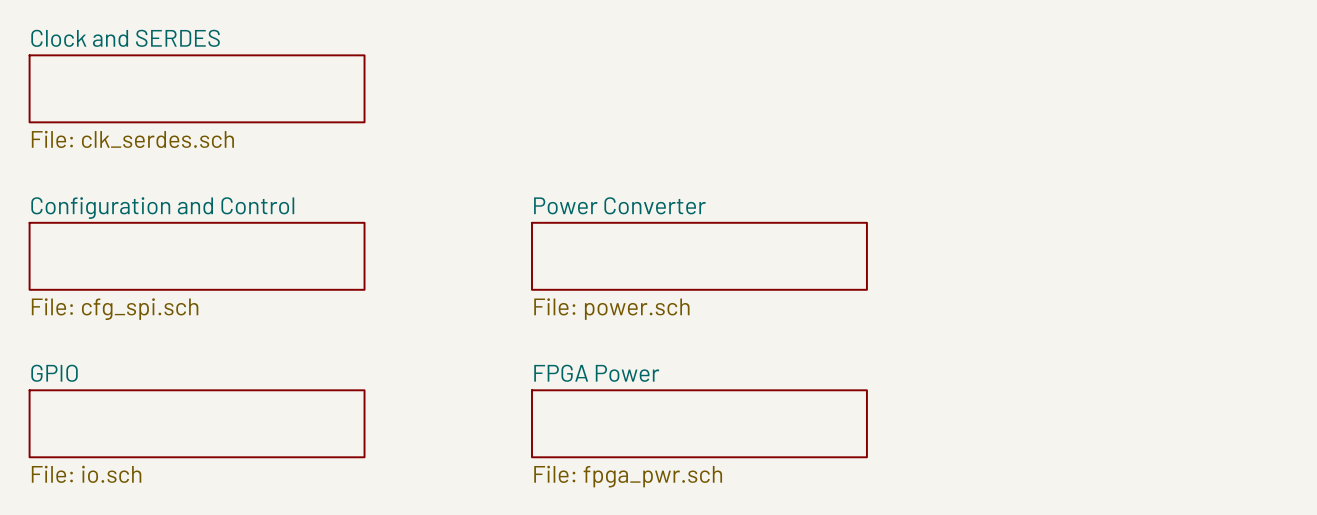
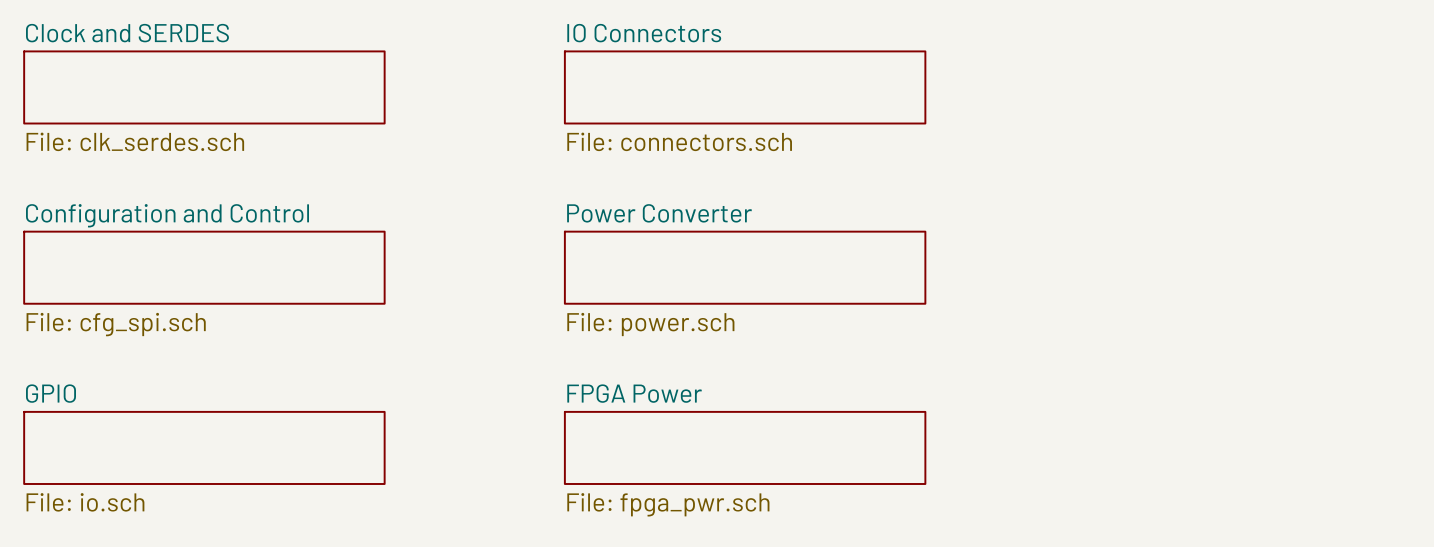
sheet IO Connectors: none -> File: connectors.sch (745, 87)

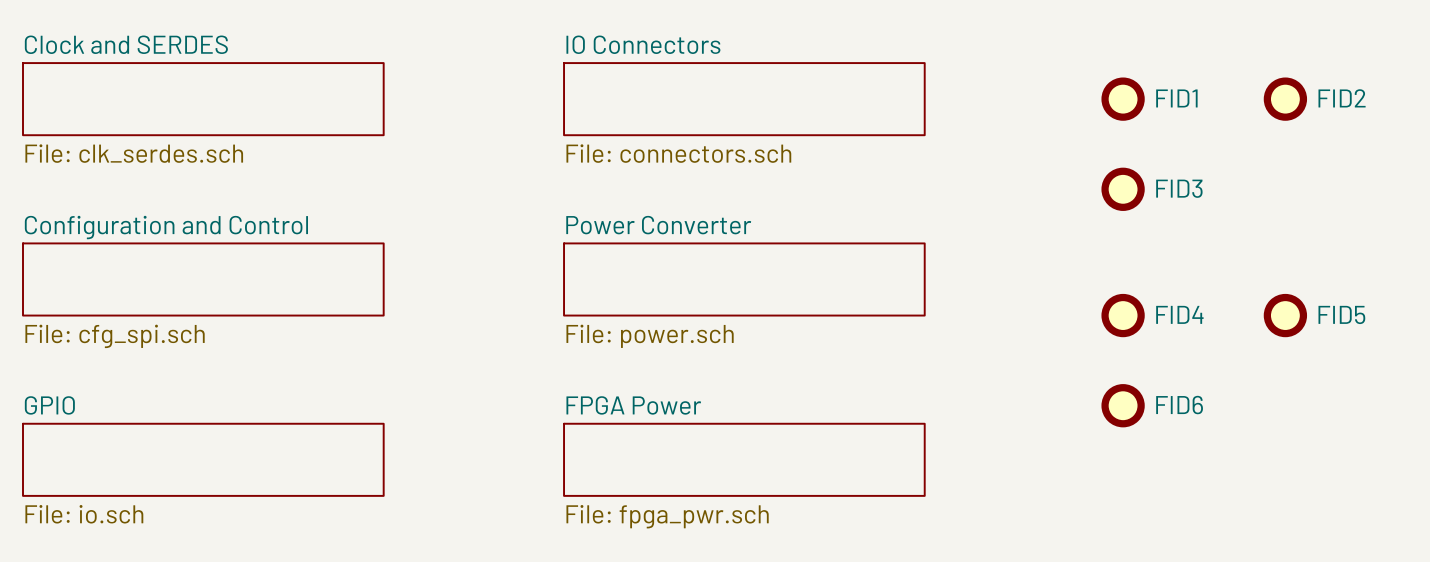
FID1: none -> (1123, 99)
FID2: none -> (1285, 99)
FID3: none -> (1123, 189)
FID4: none -> (1123, 315)
FID5: none -> (1285, 315)
FID6: none -> (1123, 405)

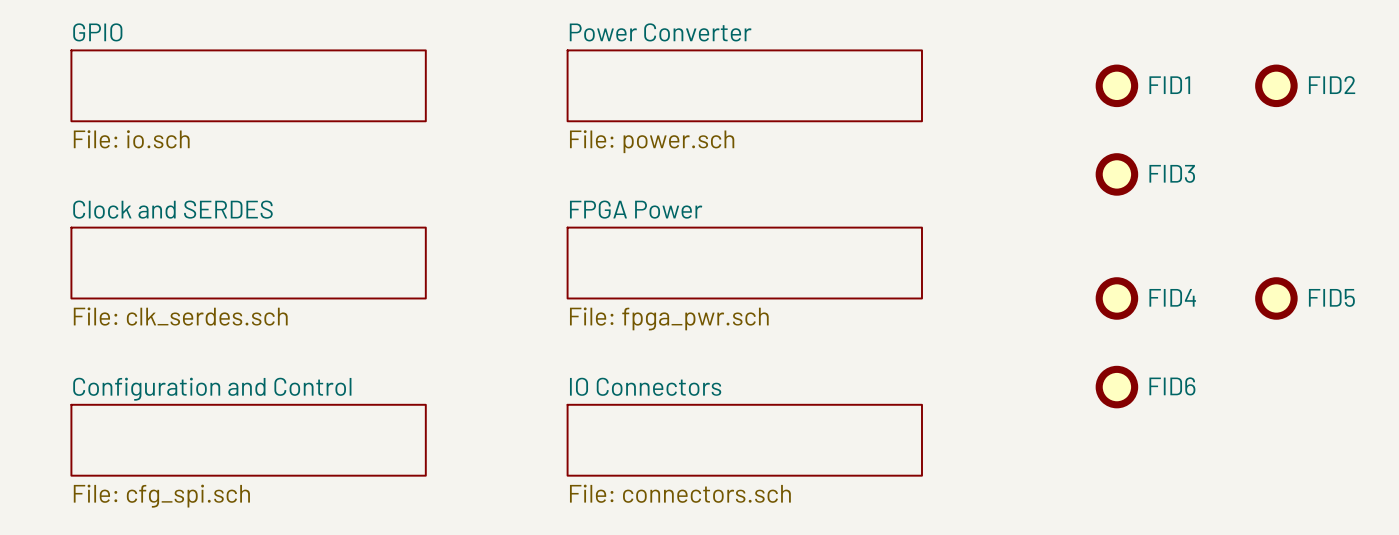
sheet IO Connectors name: IO Connectors (643, 44) -> Power Converter (660, 32)
sheet Clock and SERDES position: (203, 99) -> (248, 263)
sheet GPIO: none -> File: io.sch (248, 85)
sheet IO Connectors value: File: connectors.sch (678, 153) -> File: power.sch (652, 141)
sheet Power Converter name: Power Converter (658, 225) -> FPGA Power (636, 209)
sheet Configuration and Control position: (203, 279) -> (248, 440)
sheet Power Converter value: File: power.sch (650, 336) -> File: fpga_pwr.sch (669, 318)
sheet FPGA Power name: FPGA Power (633, 405) -> IO Connectors (645, 386)
sheet GPIO: File: io.sch (203, 459) -> none
sheet FPGA Power value: File: fpga_pwr.sch (667, 516) -> File: connectors.sch (680, 493)

